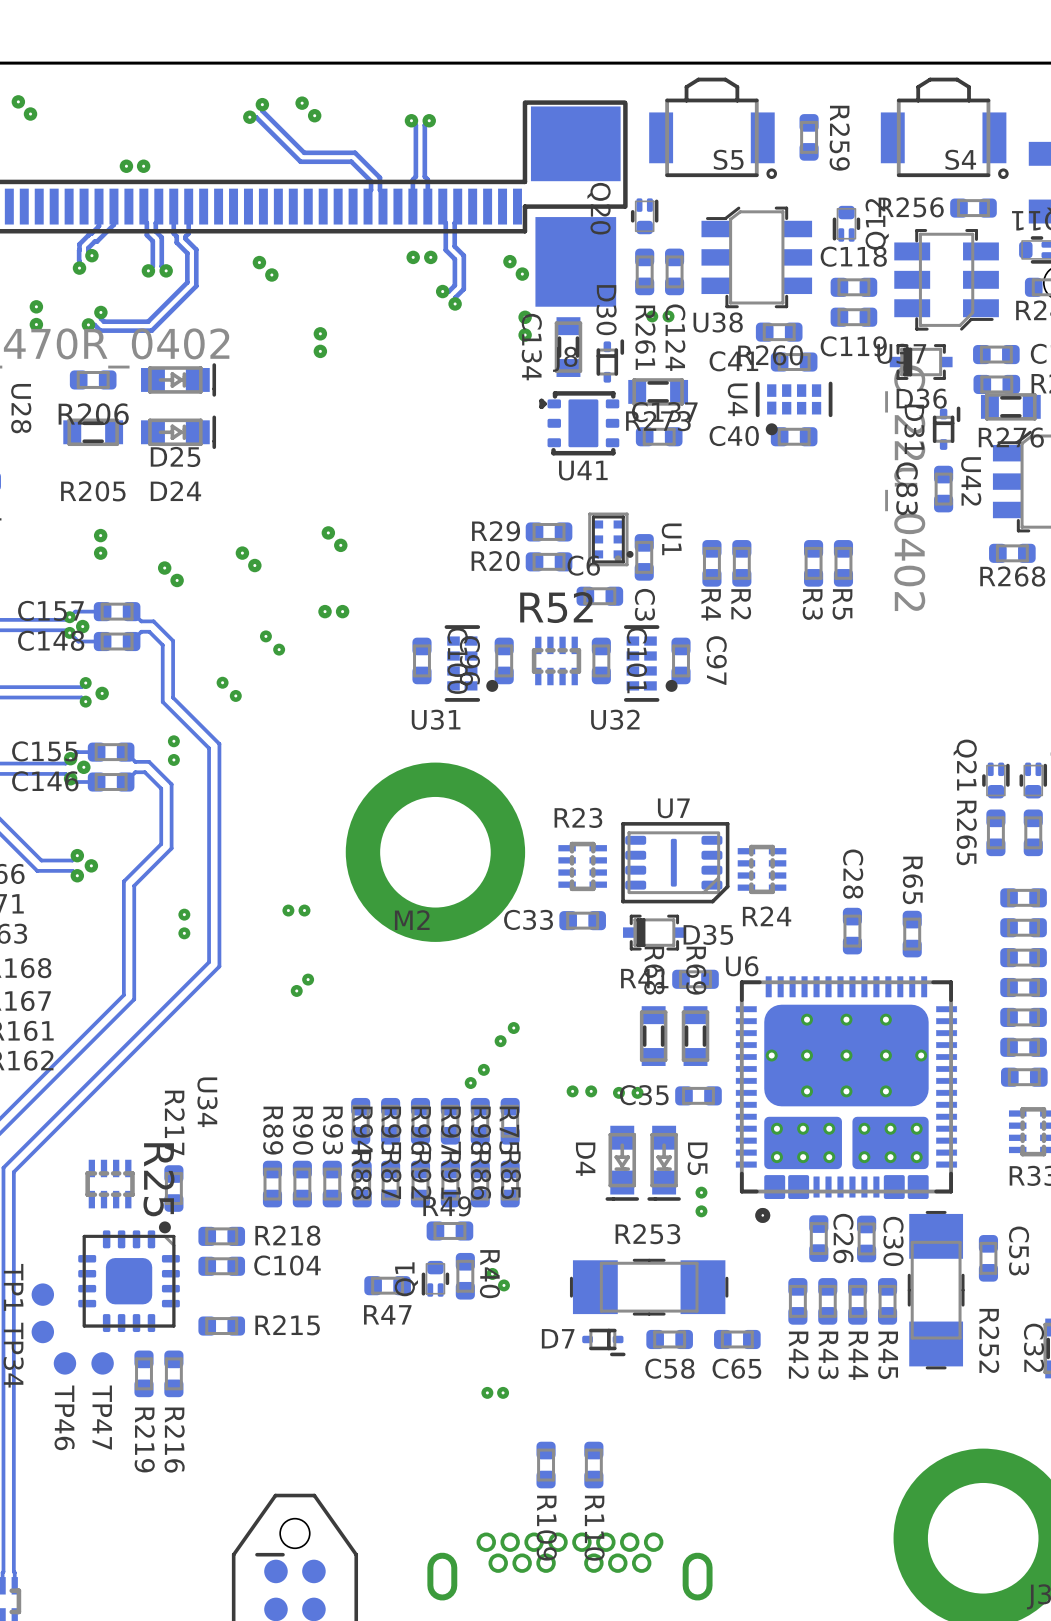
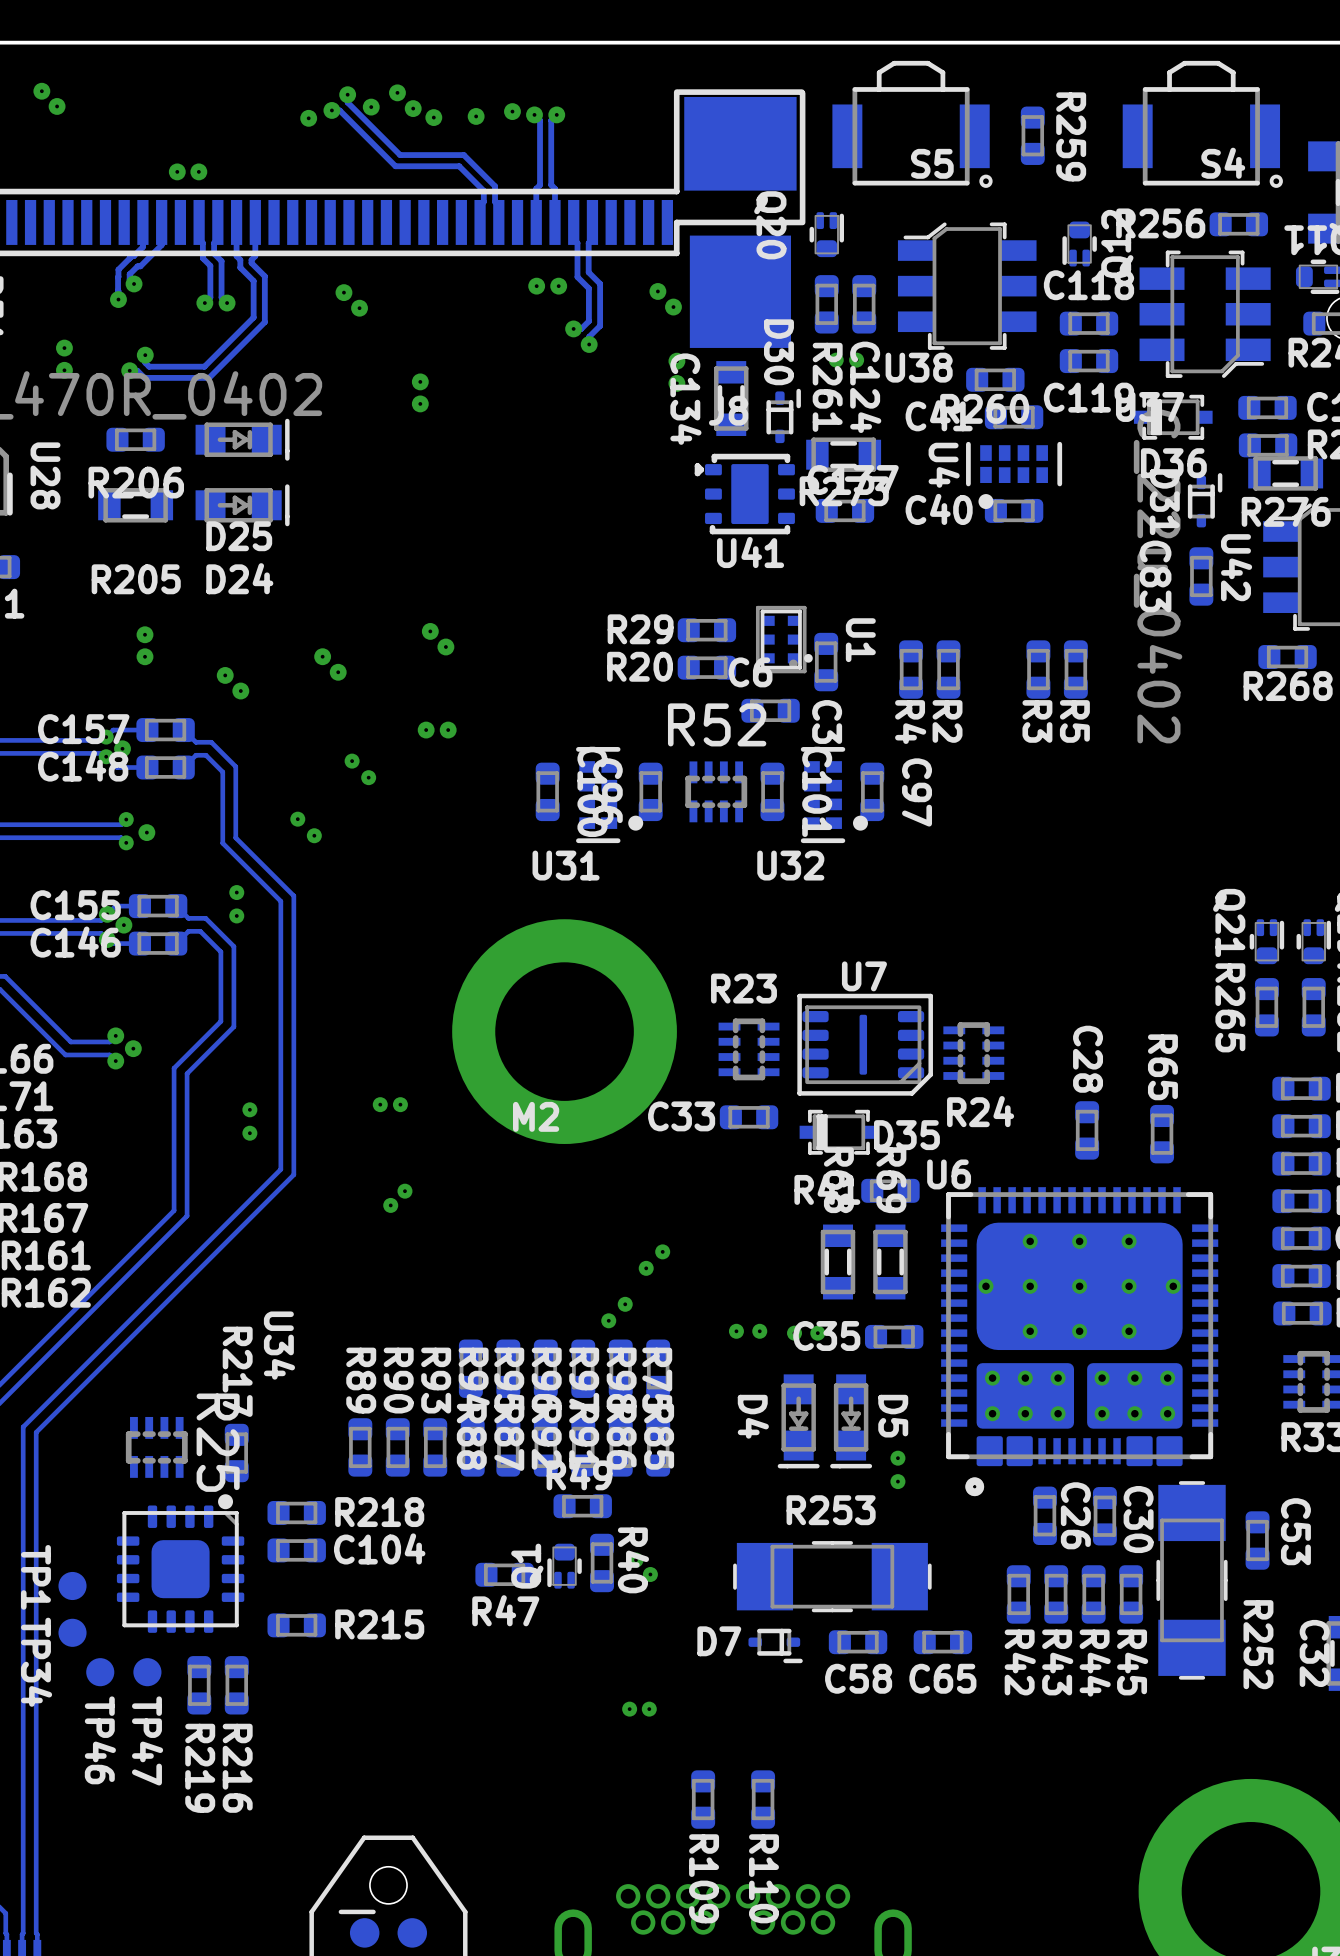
via: none -> (371, 107)
via: none -> (512, 111)
via: none -> (433, 117)
via: none -> (476, 116)
via: none -> (308, 118)

